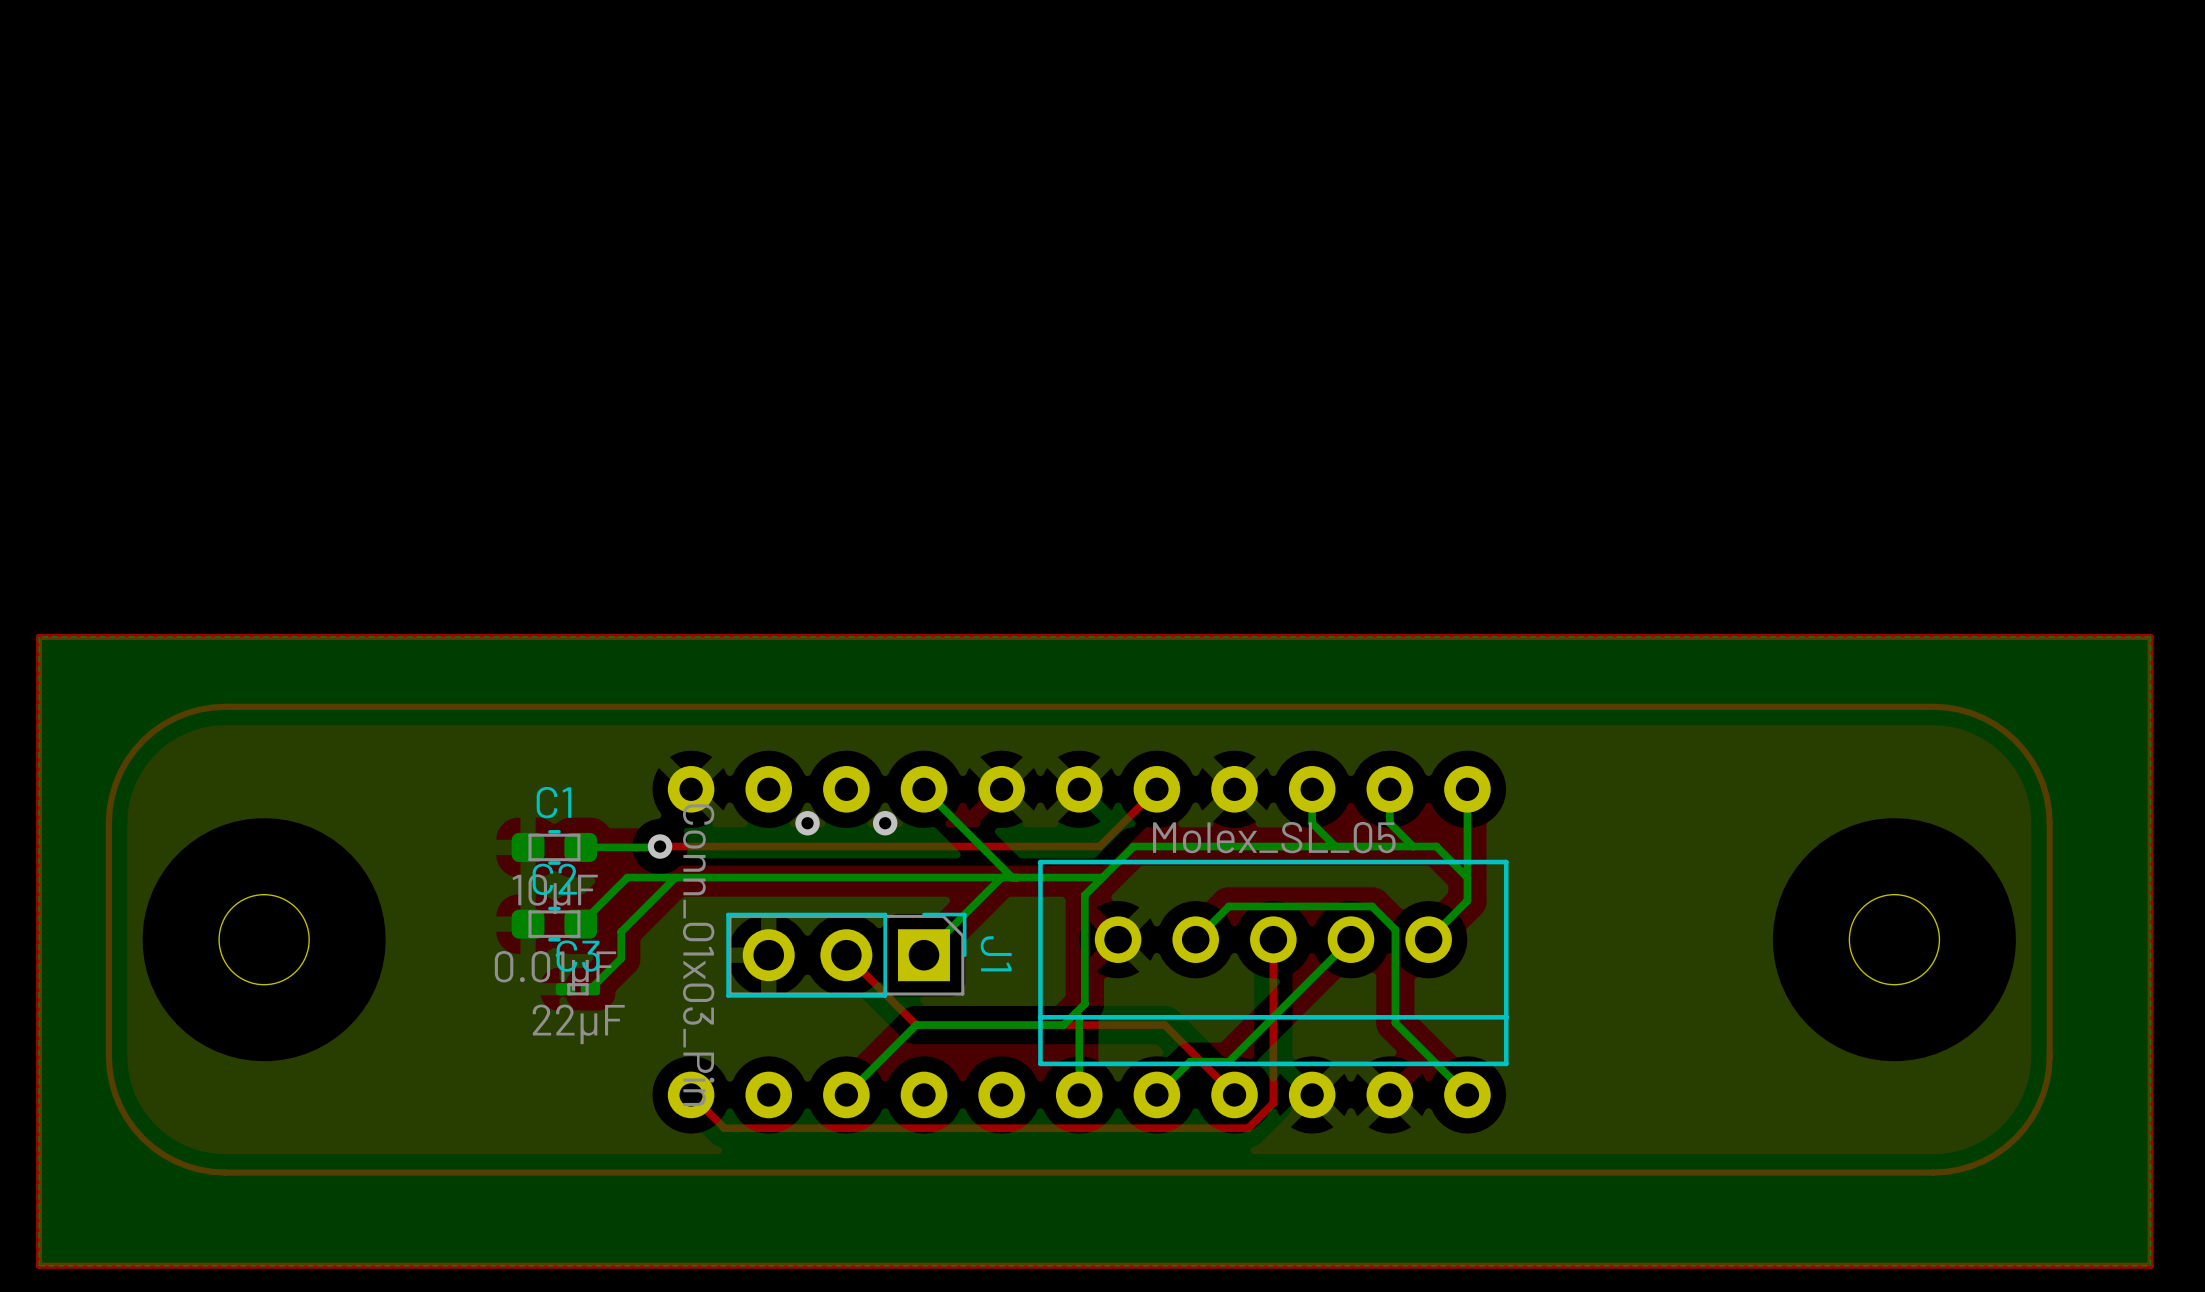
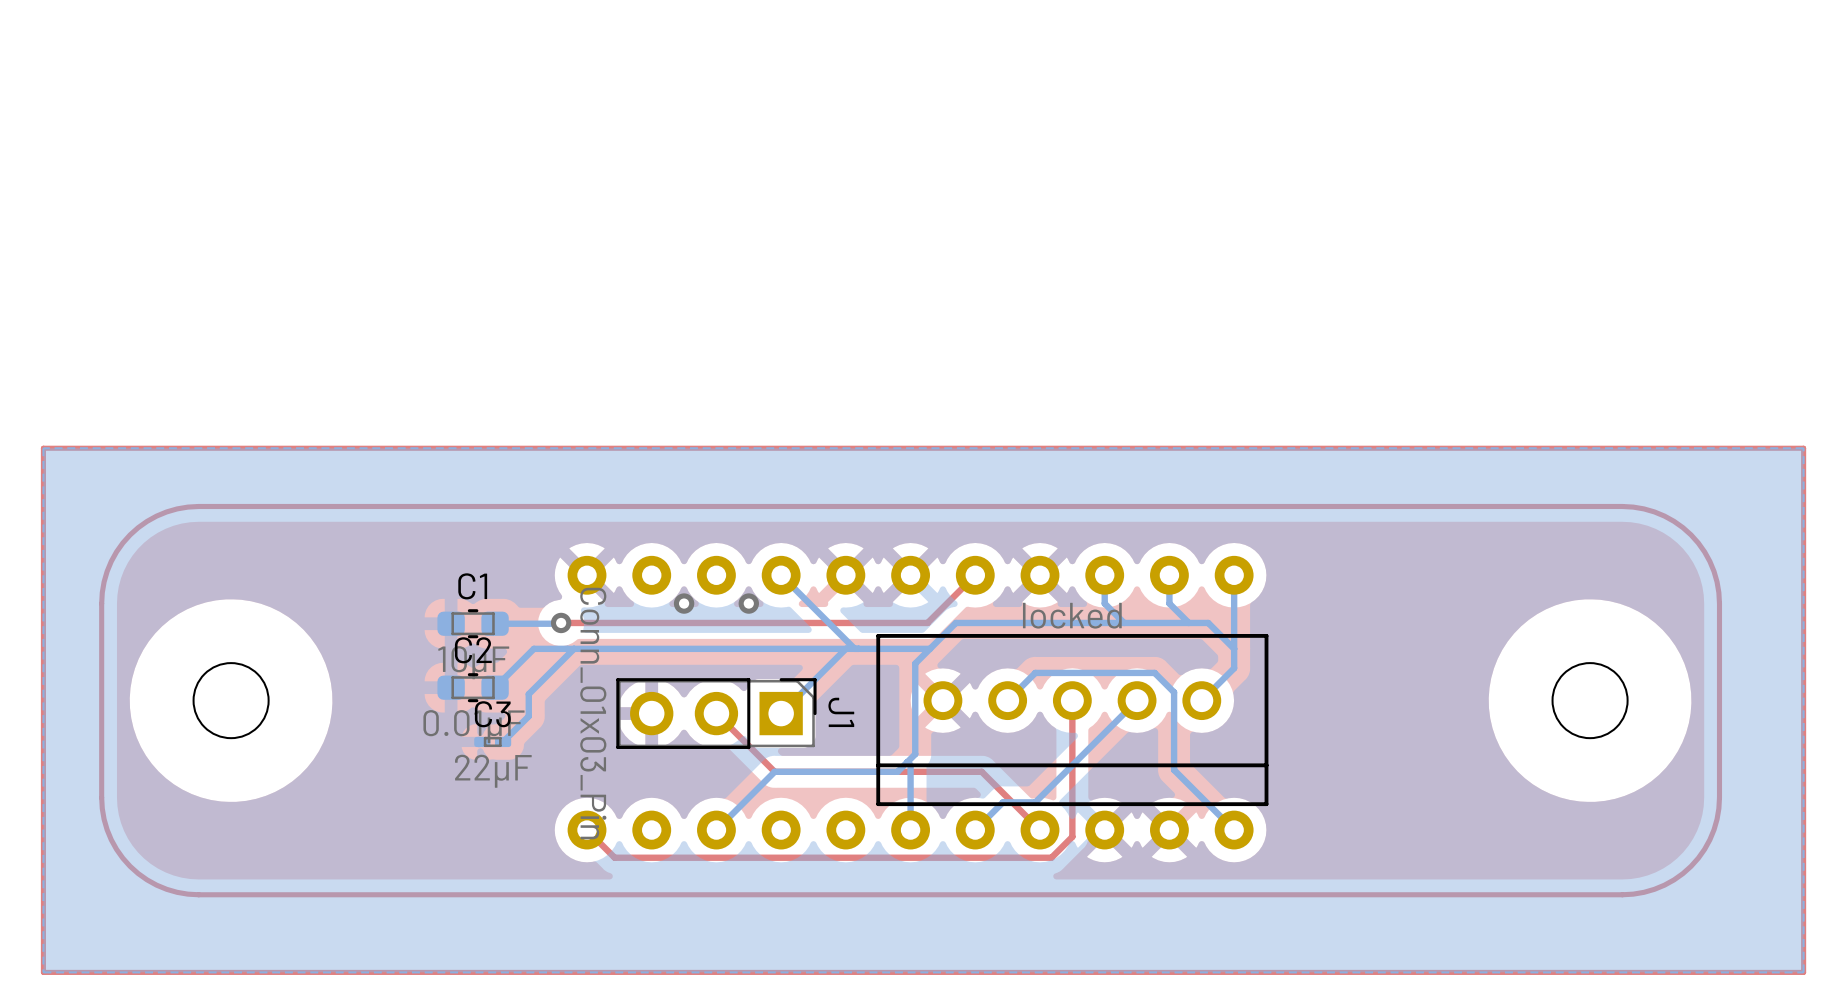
part value: Molex_SL_05 (1274, 837) -> locked (1072, 615)

